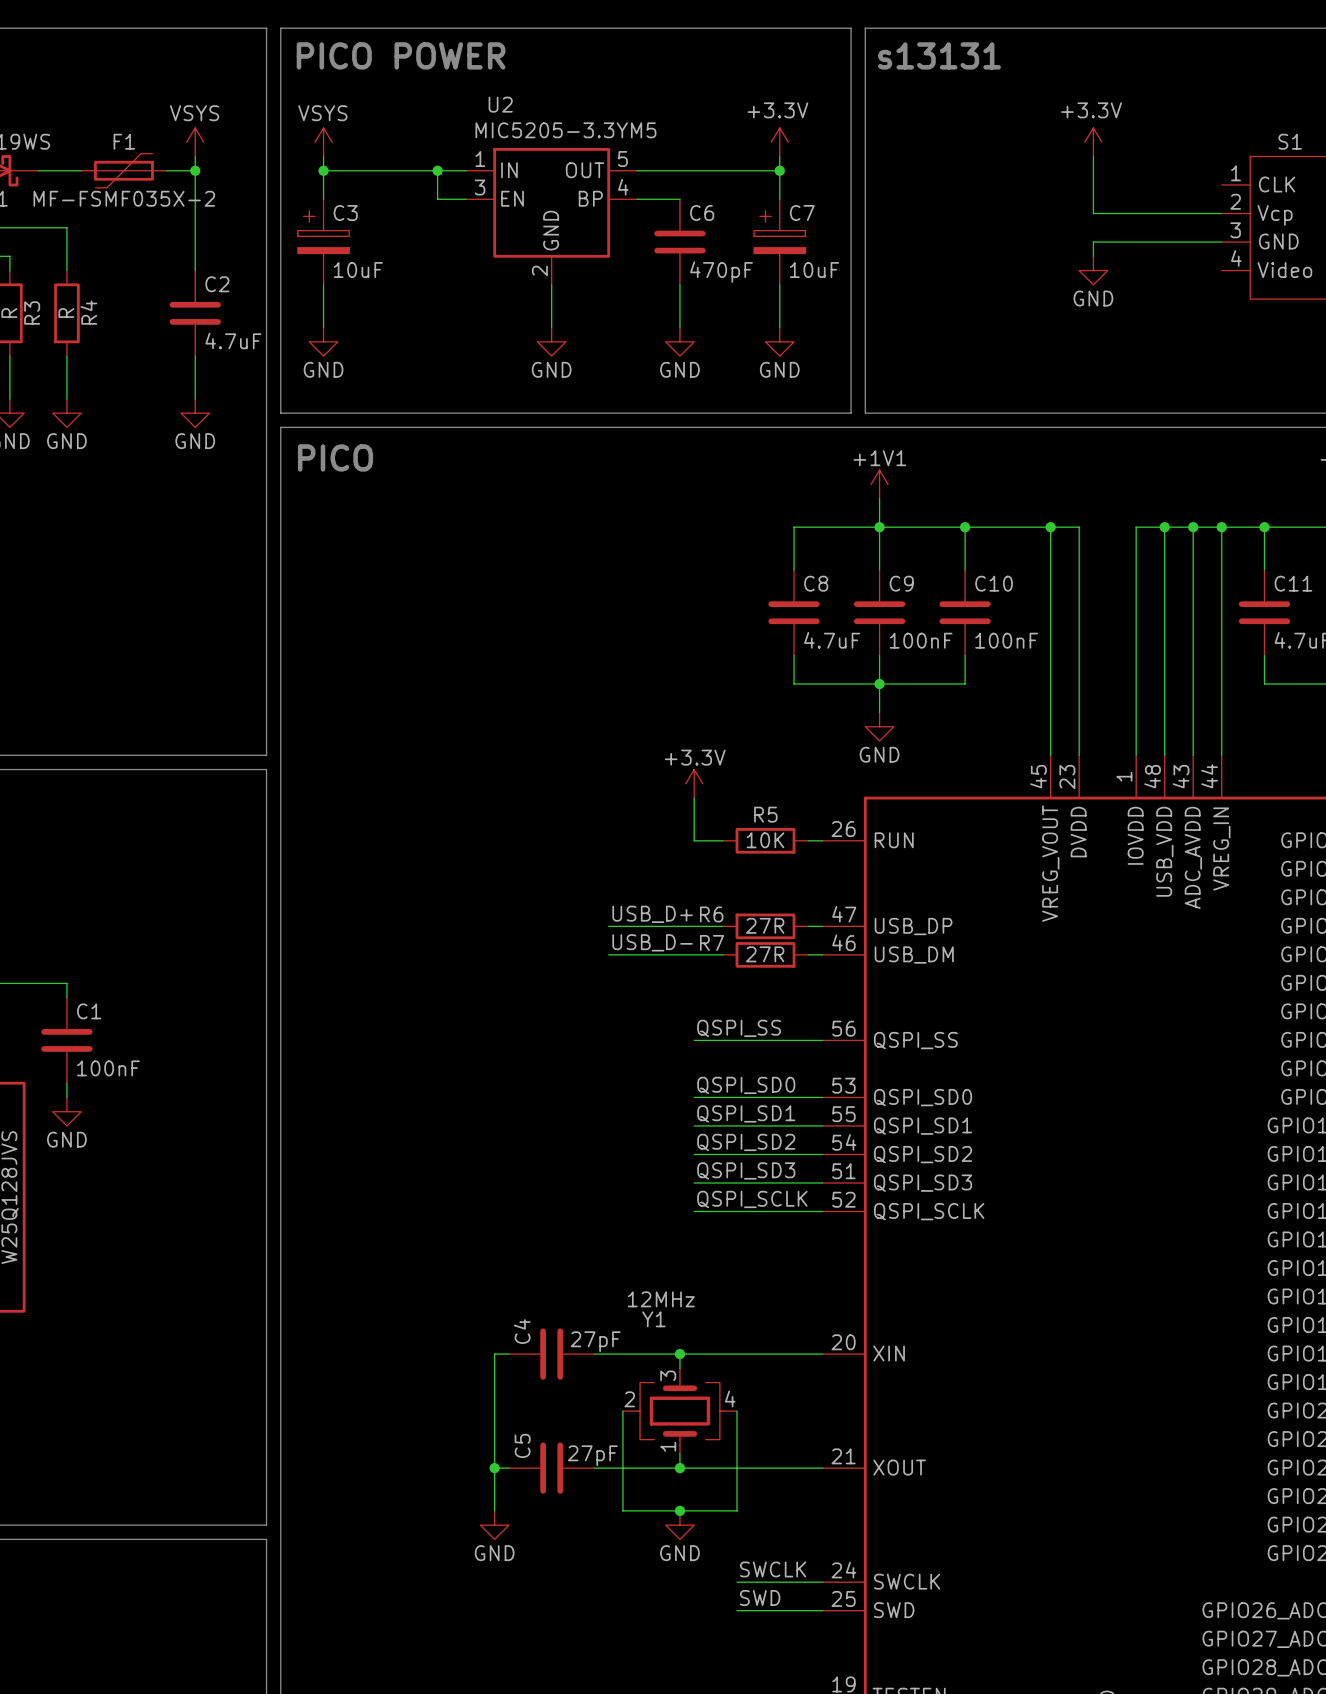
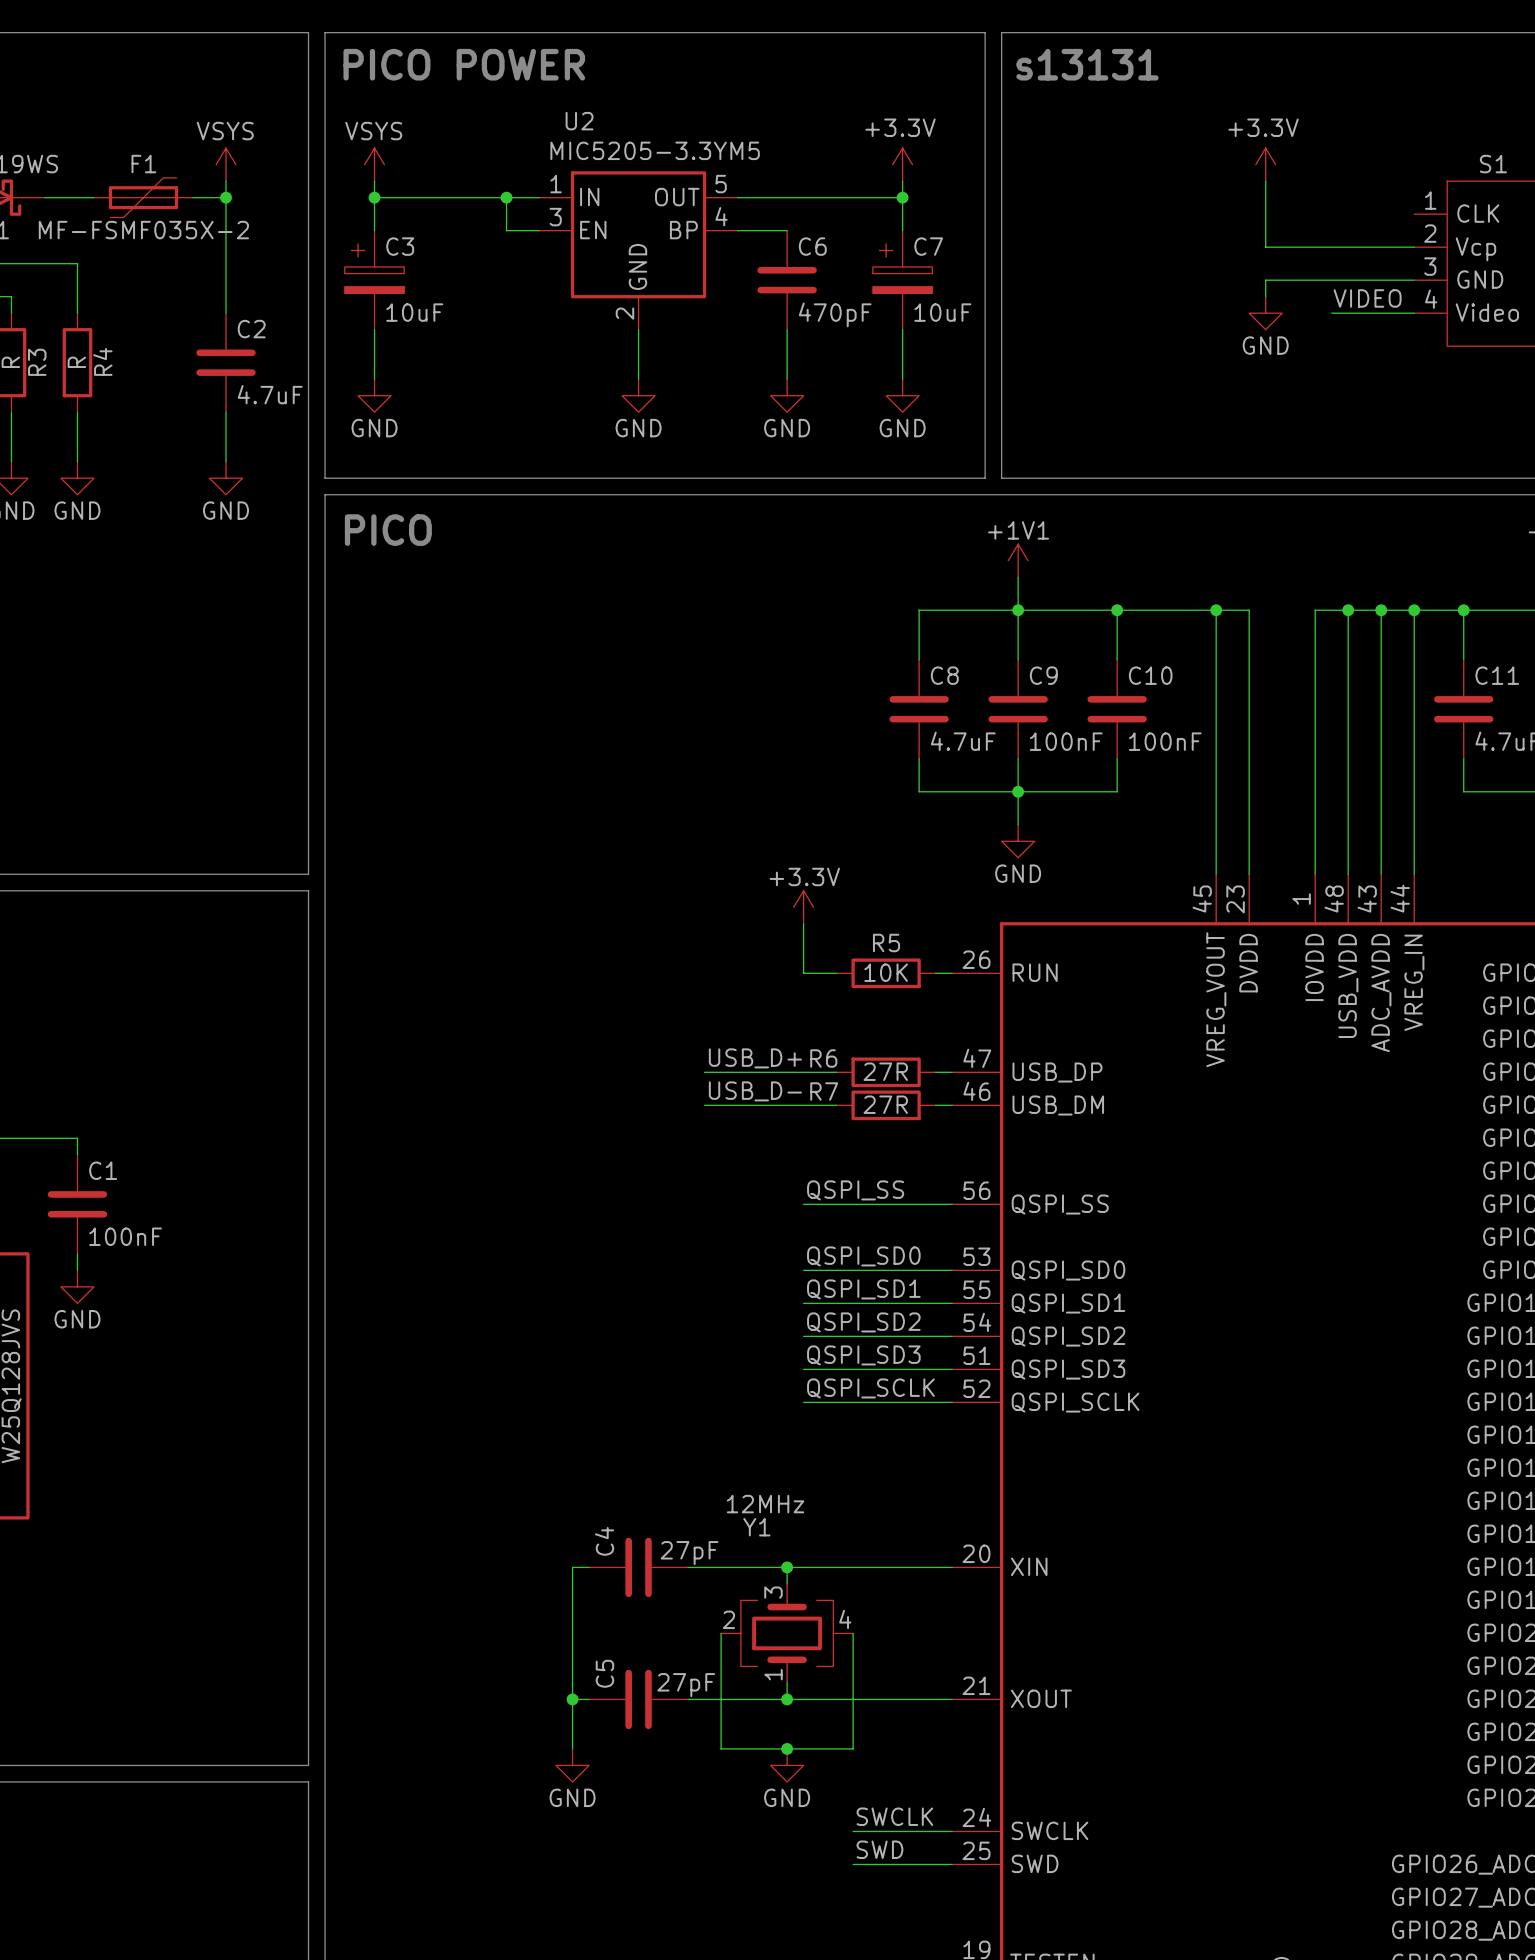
label: none -> VIDEO (1367, 298)
wire: none -> (1331, 313) (1414, 313)

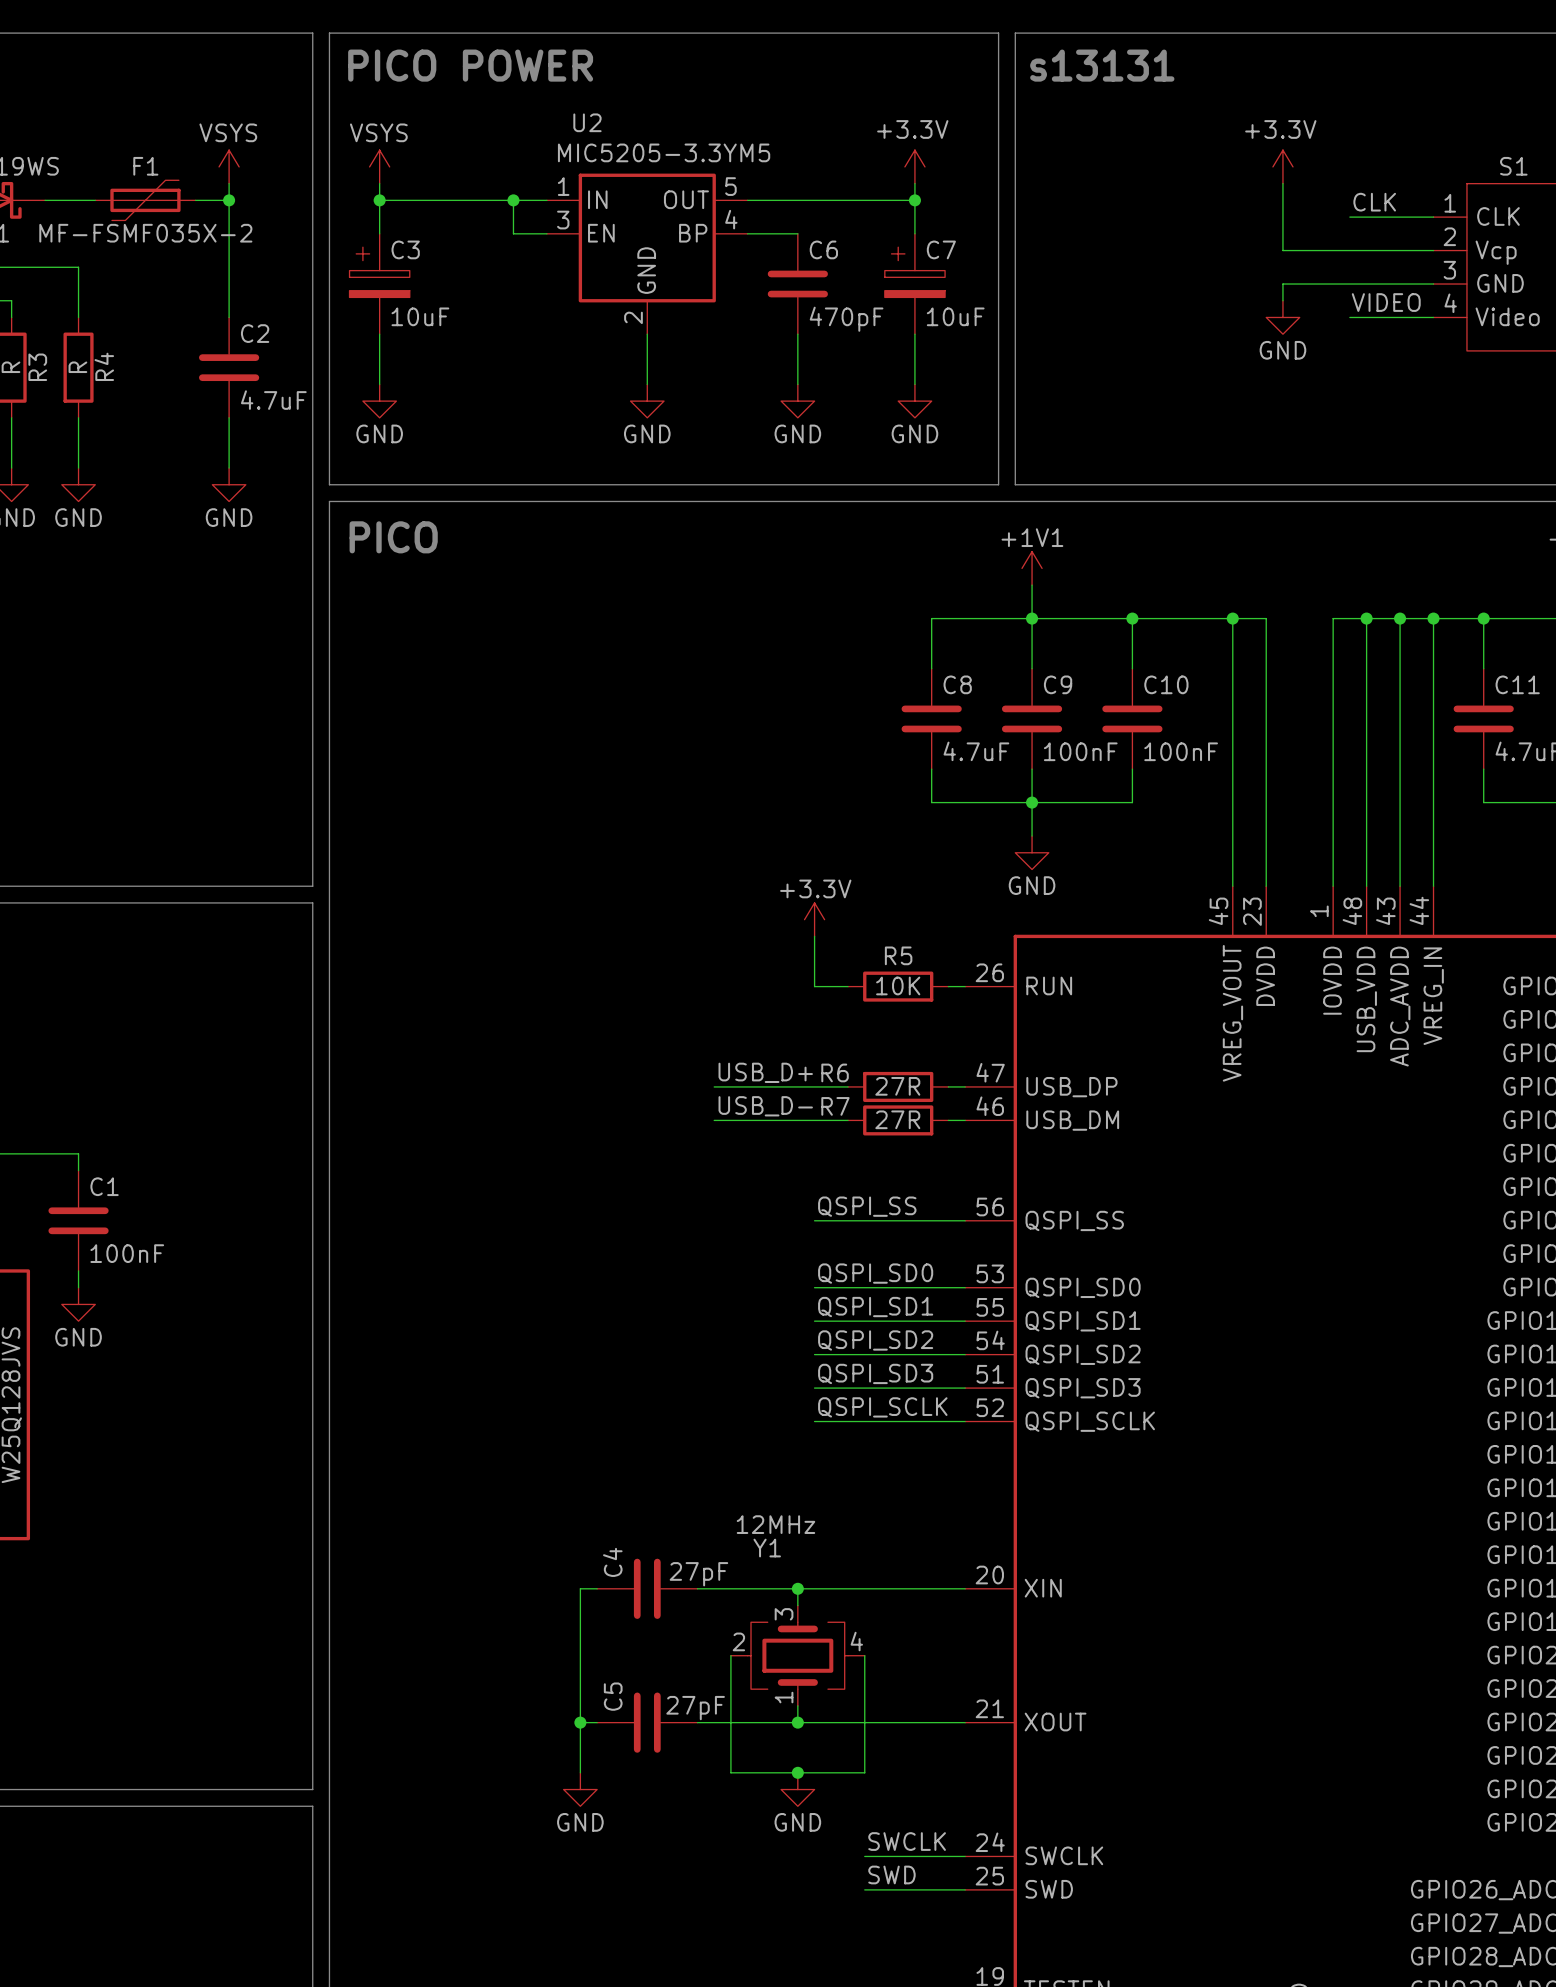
label: none -> CLK (1374, 202)
wire: none -> (1349, 217) (1433, 217)

